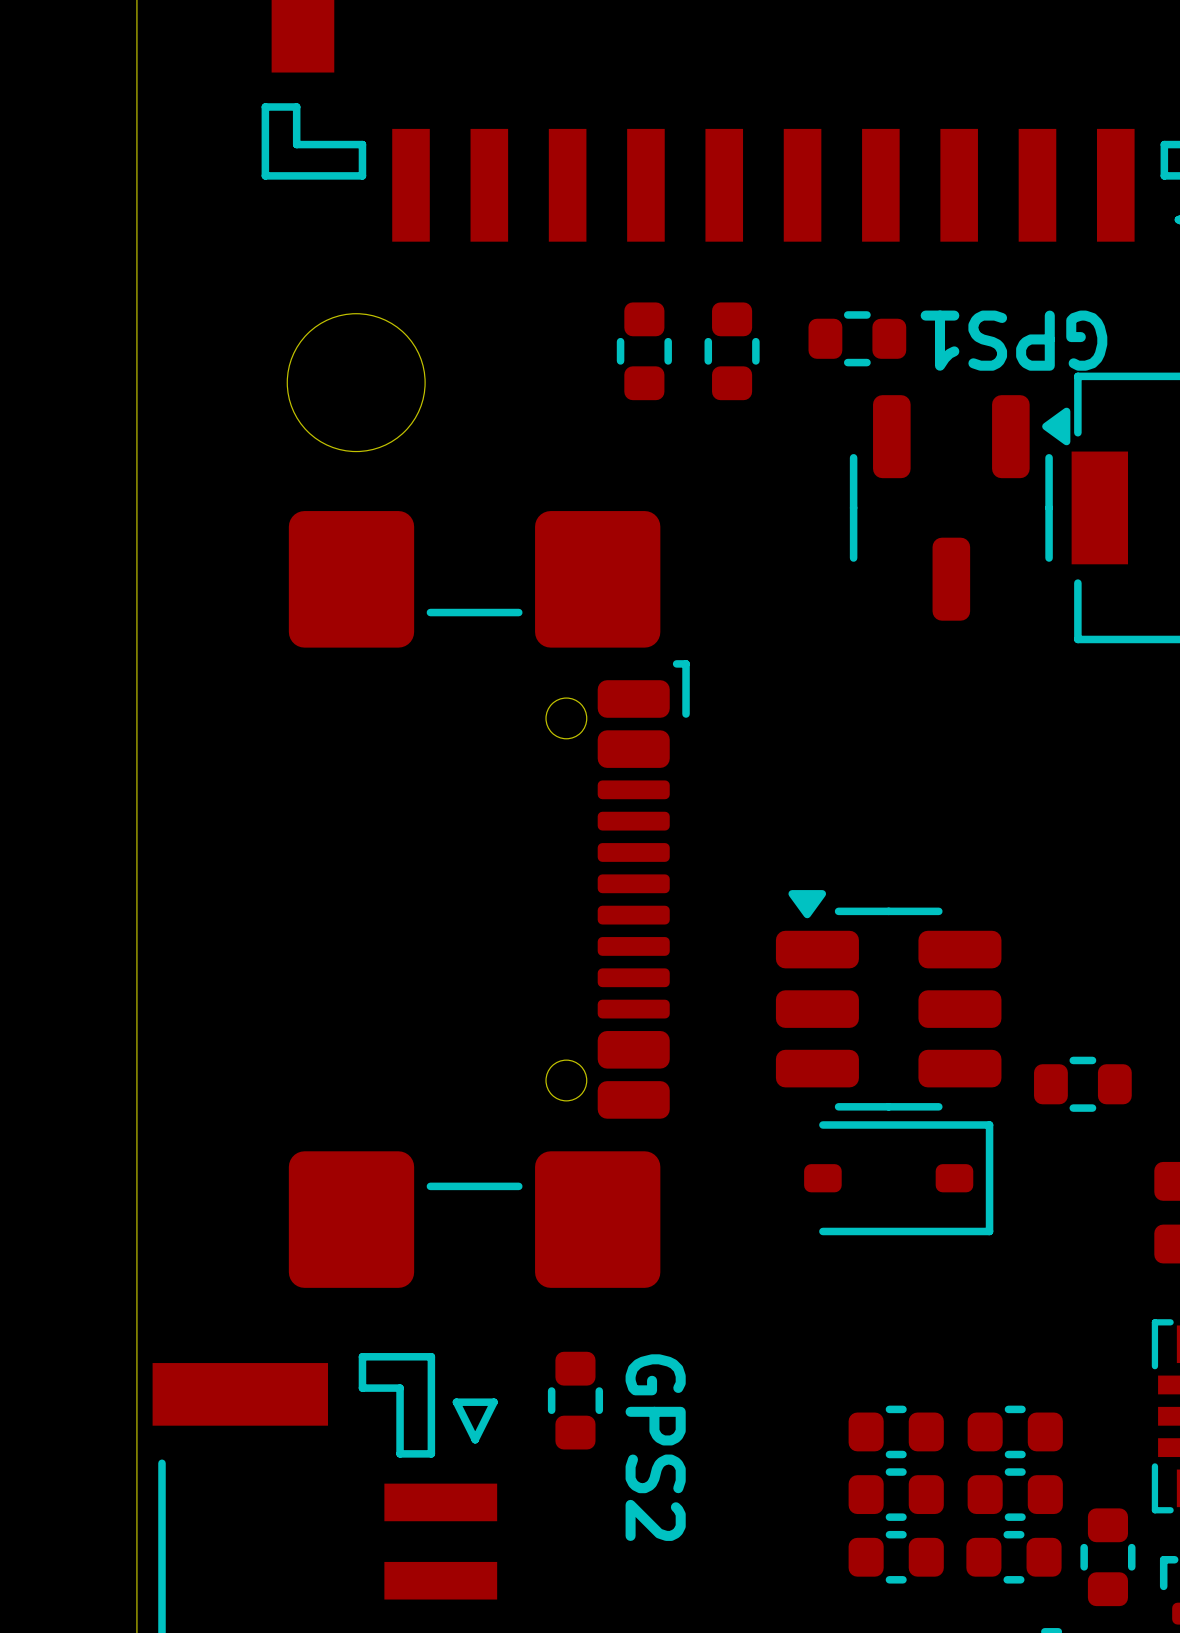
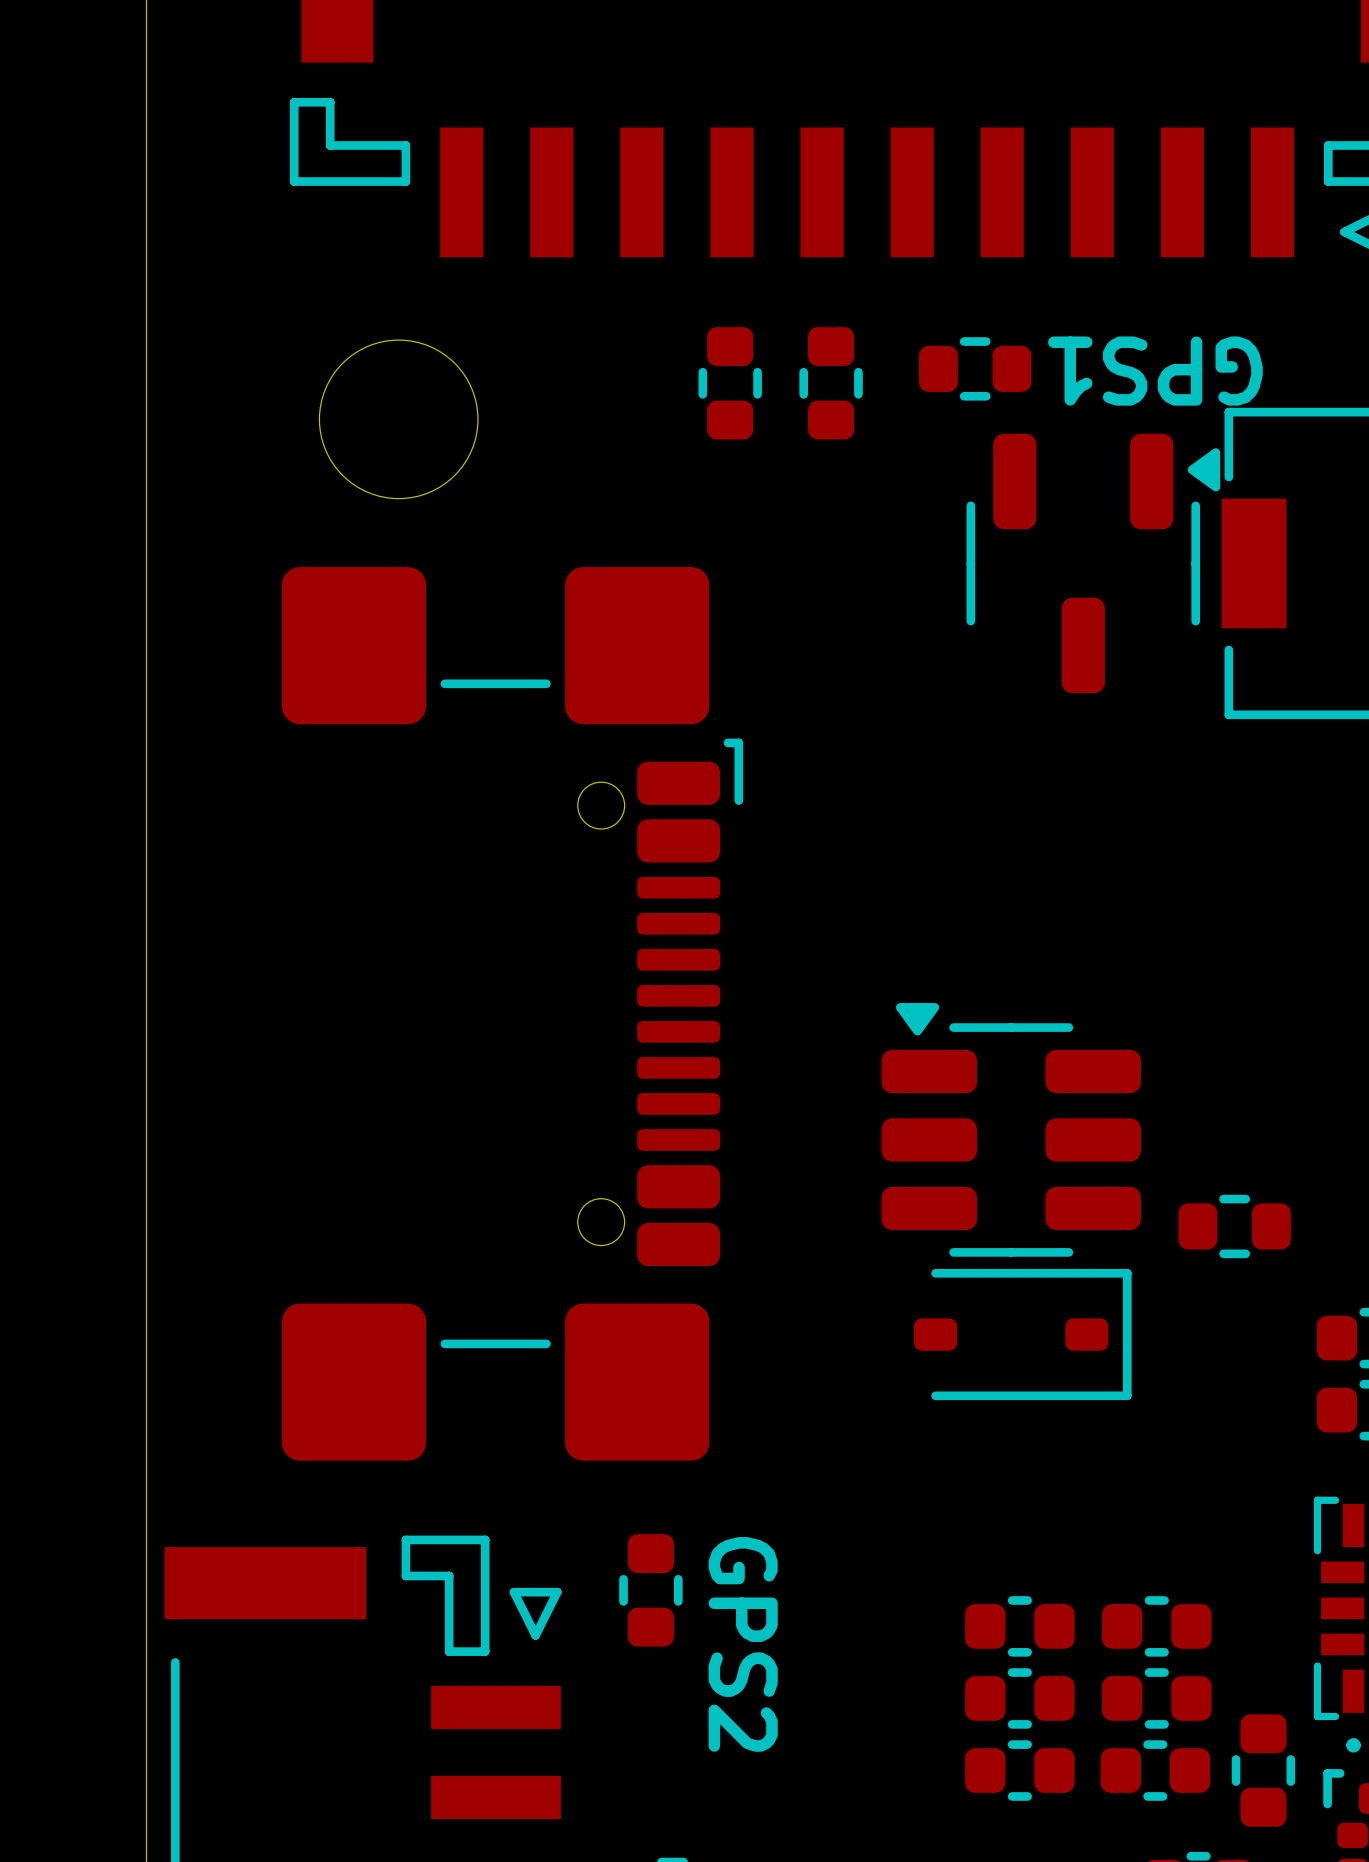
part position: (489, 899) -> (512, 1013)

